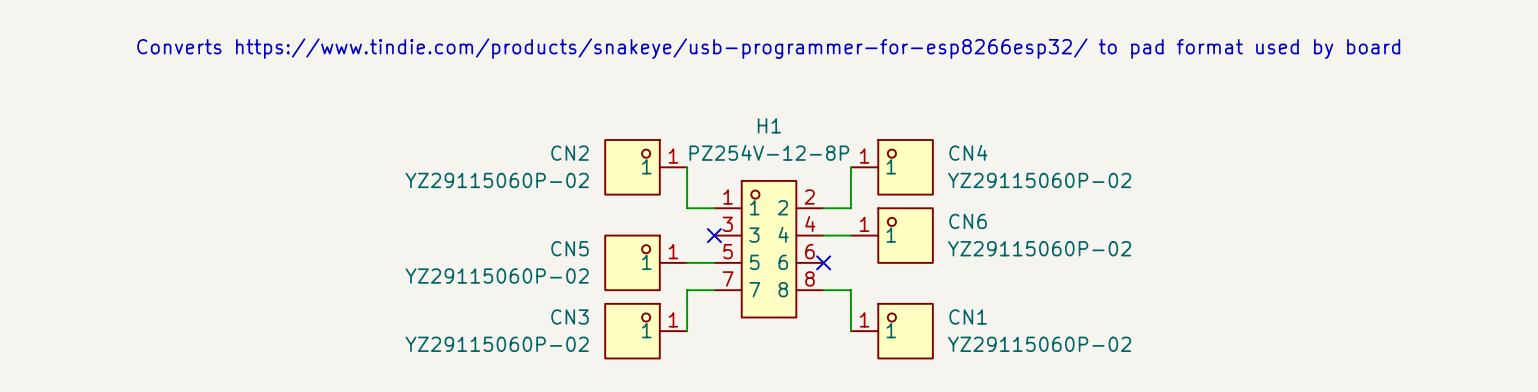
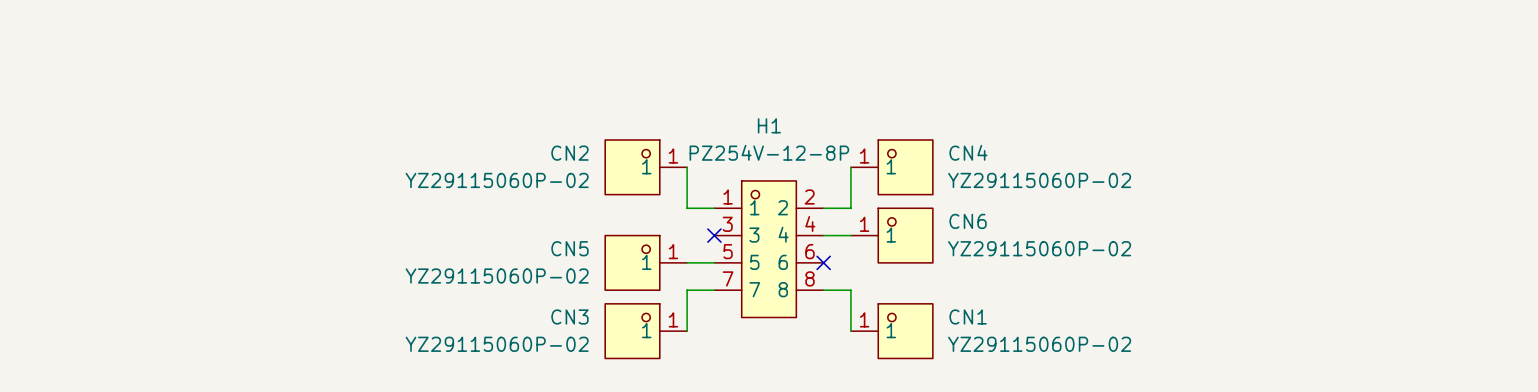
text: Converts https://www.tindie.com/products/snakeye/usb-programmer-for-esp8266esp32/ to pad format used by board (768, 48) -> none

